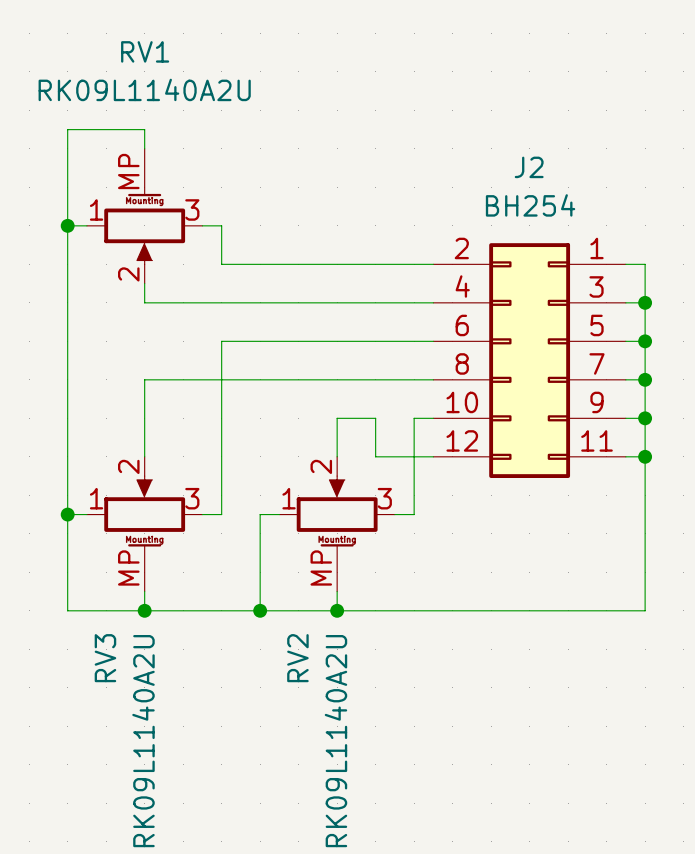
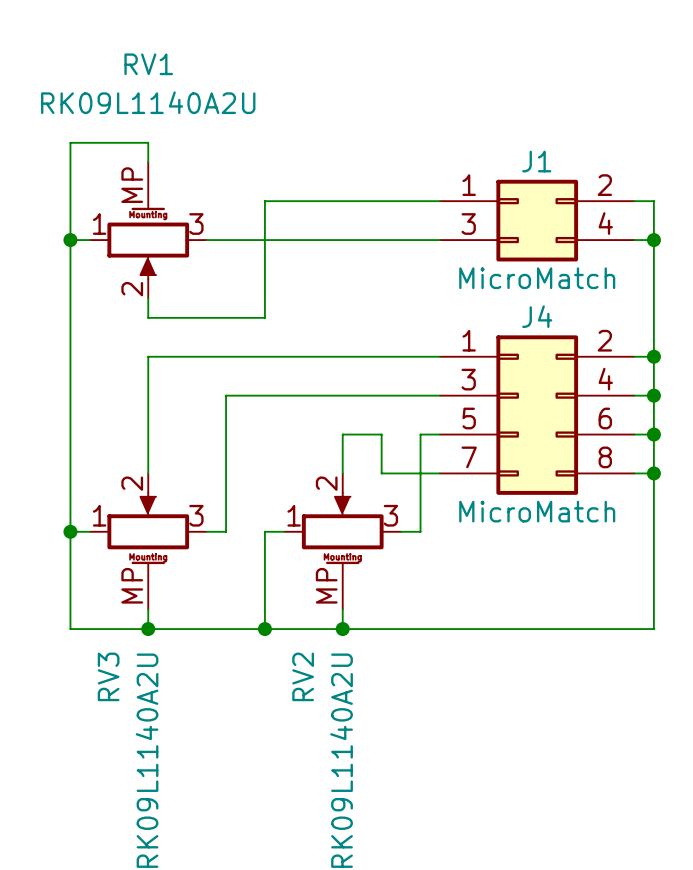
J1: none -> MicroMatch (537, 220)
wire: (221, 225) (221, 264) (433, 264) -> (226, 240) (439, 240)
wire: (625, 264) (645, 264) -> (634, 201) (653, 201) (653, 278)
wire: (260, 302) (433, 302) -> (264, 317) (264, 201) (439, 201)
wire: (625, 302) (645, 302) -> (634, 240) (653, 240)
junction position: (645, 302) -> (653, 240)
wire: (221, 341) (221, 379) (144, 379) -> (226, 356) (148, 356) (148, 395)
J2: BH254 (529, 360) -> none
J4: none -> MicroMatch (537, 415)

